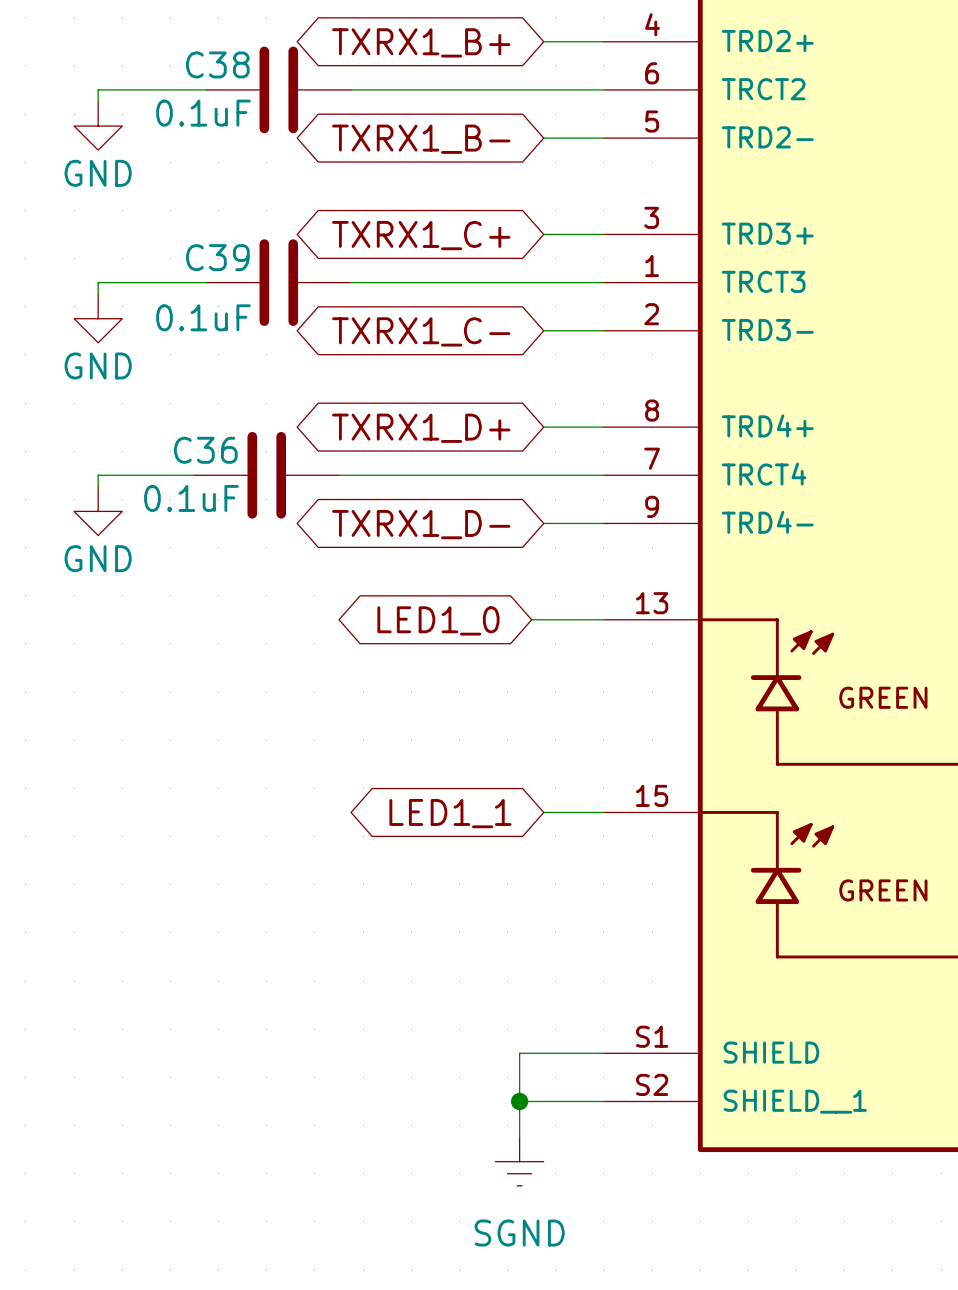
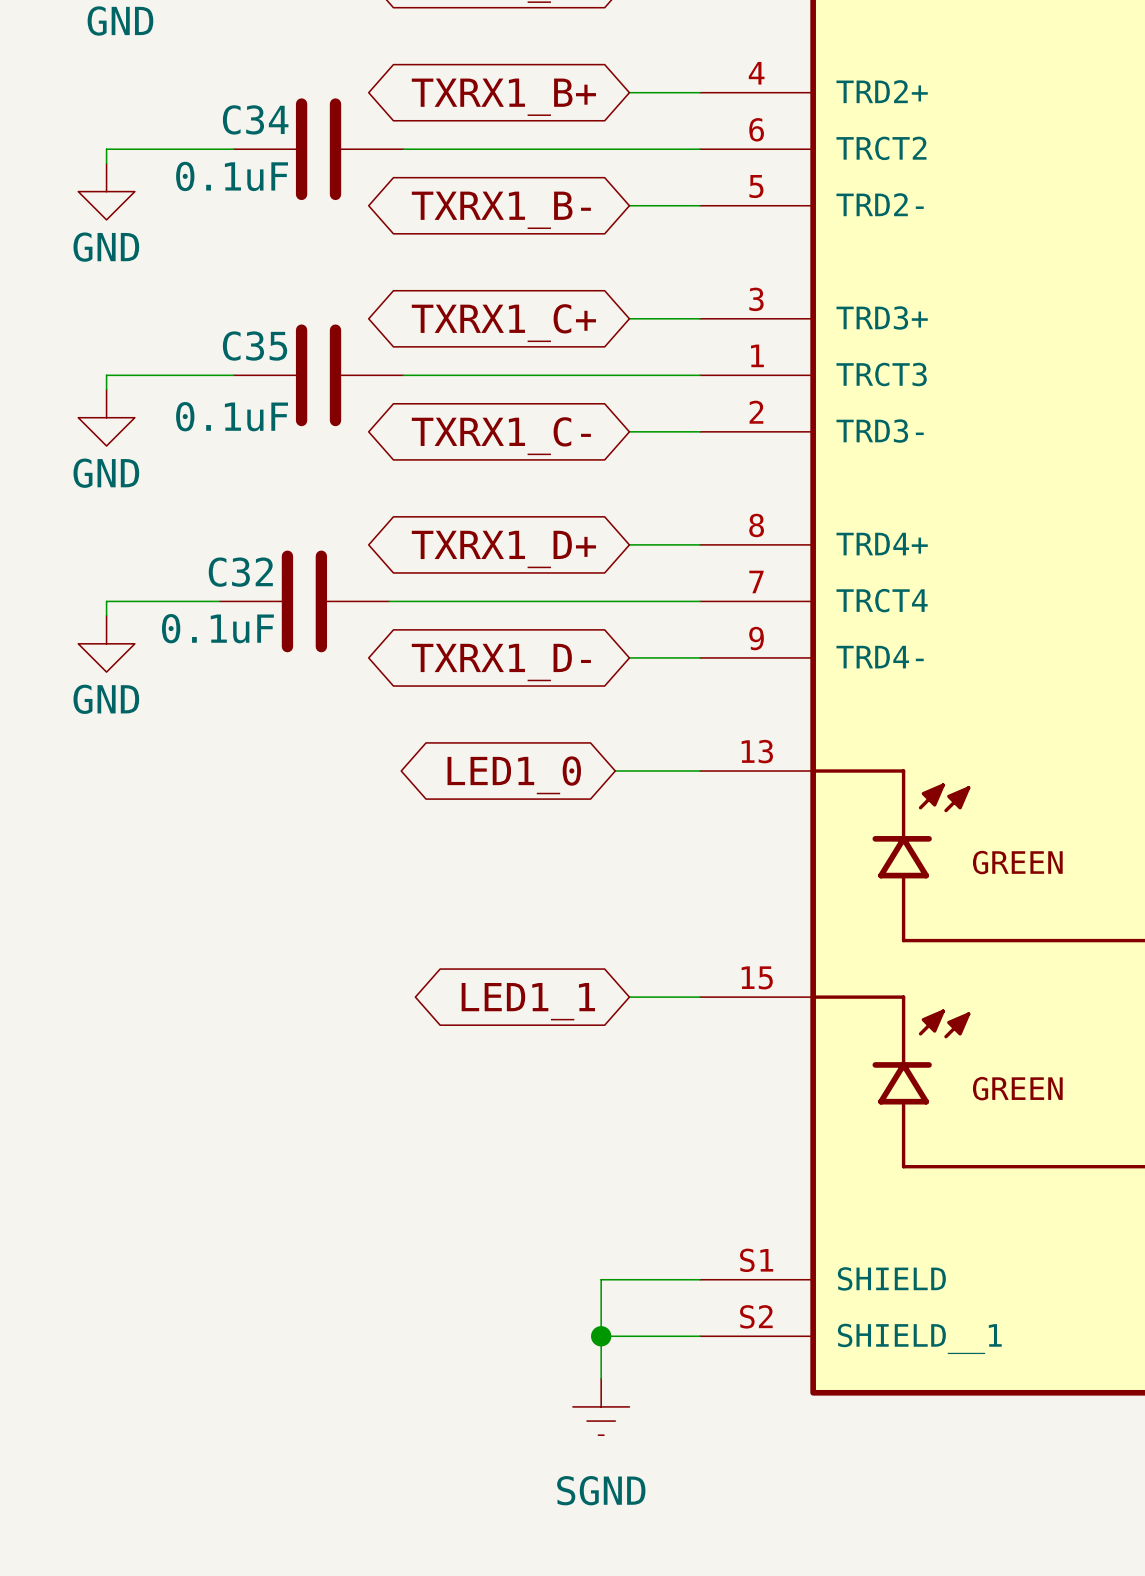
C38 name: C38 (217, 64) -> C34 (255, 119)
C39 name: C39 (217, 257) -> C35 (255, 346)
C36 name: C36 (205, 450) -> C32 (240, 572)

